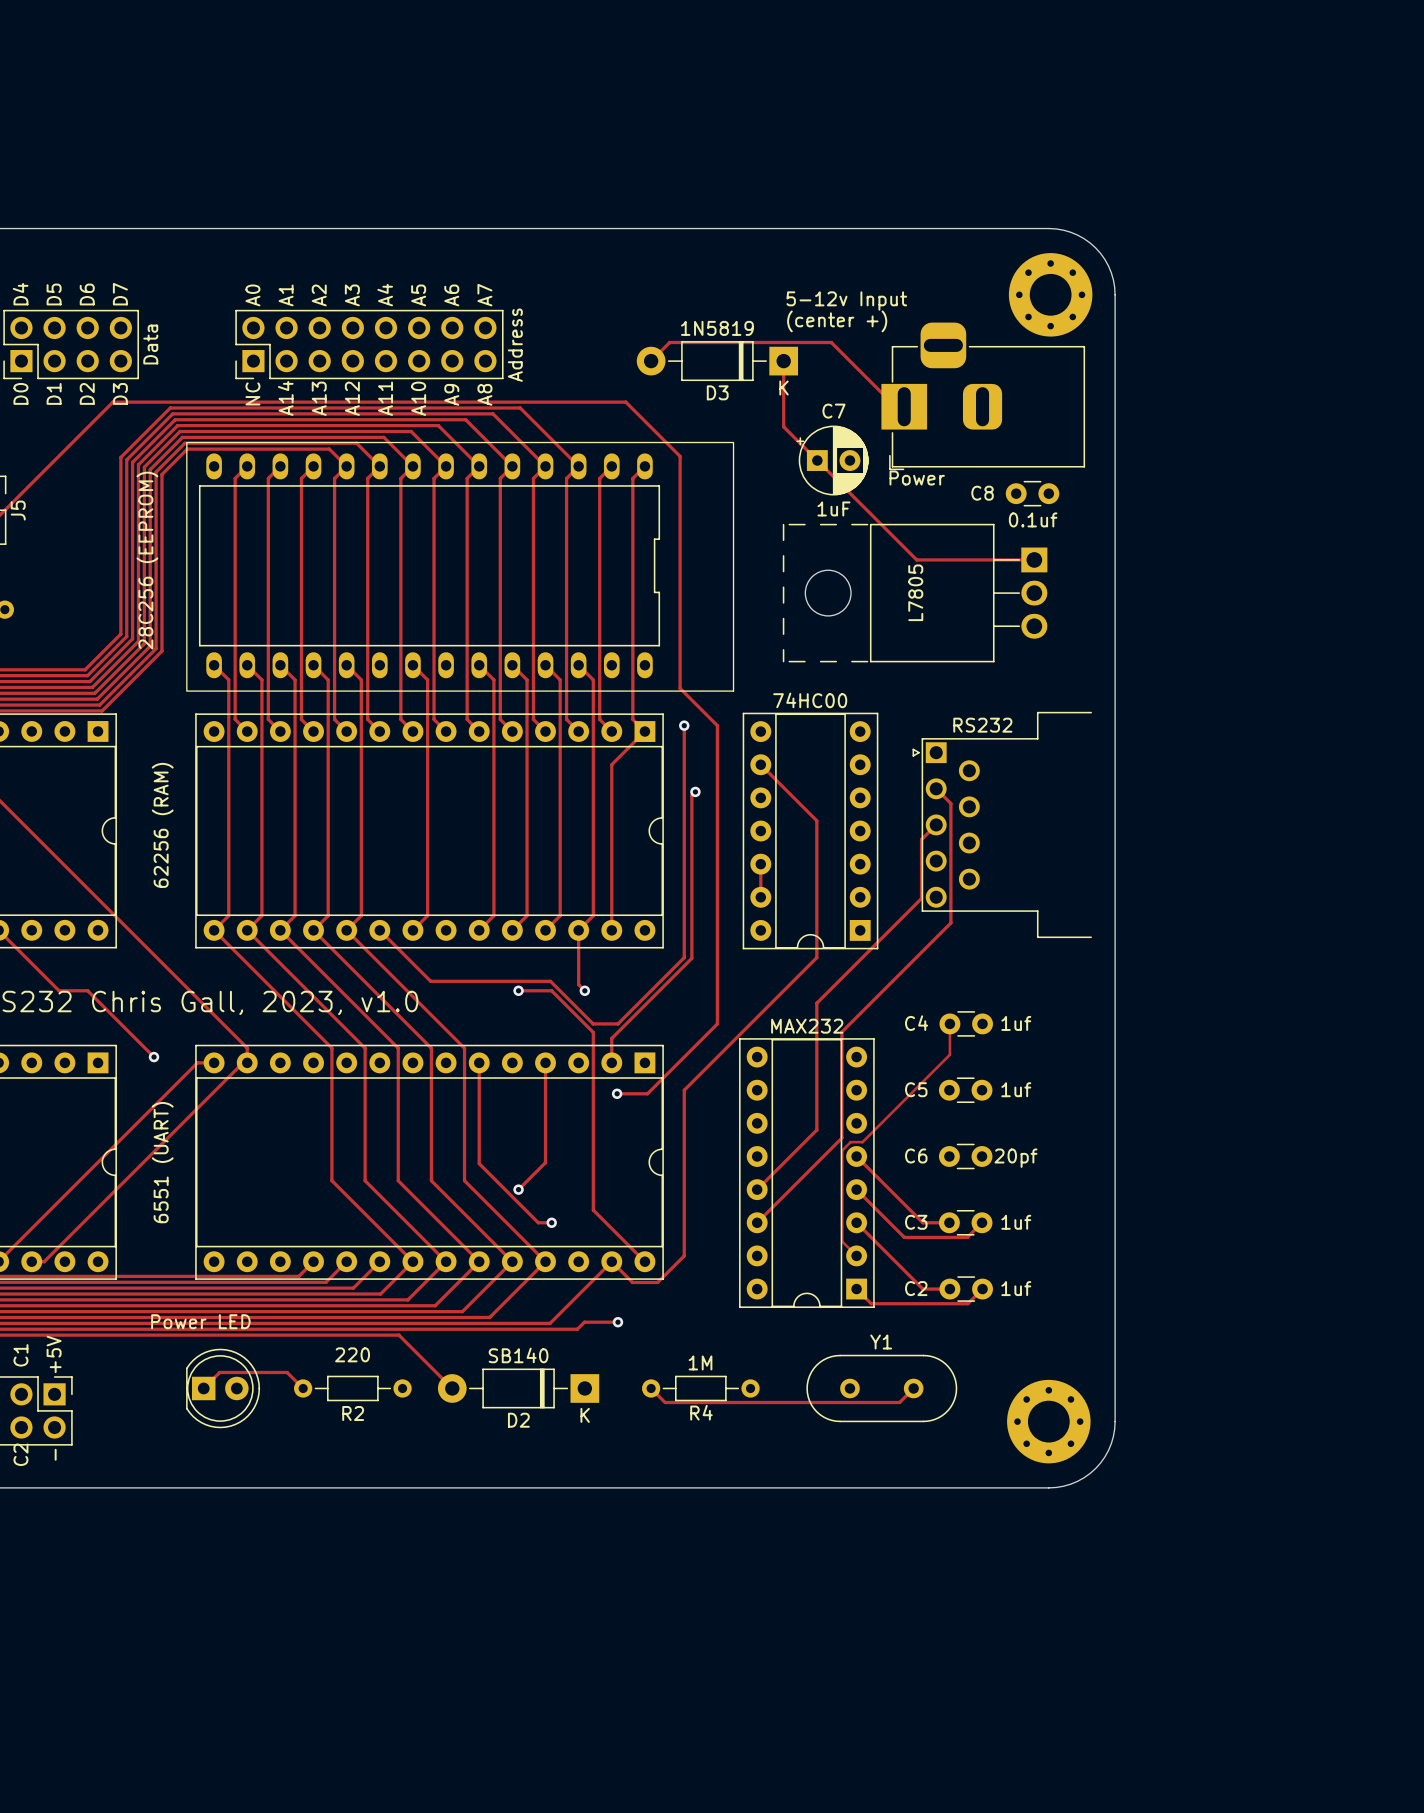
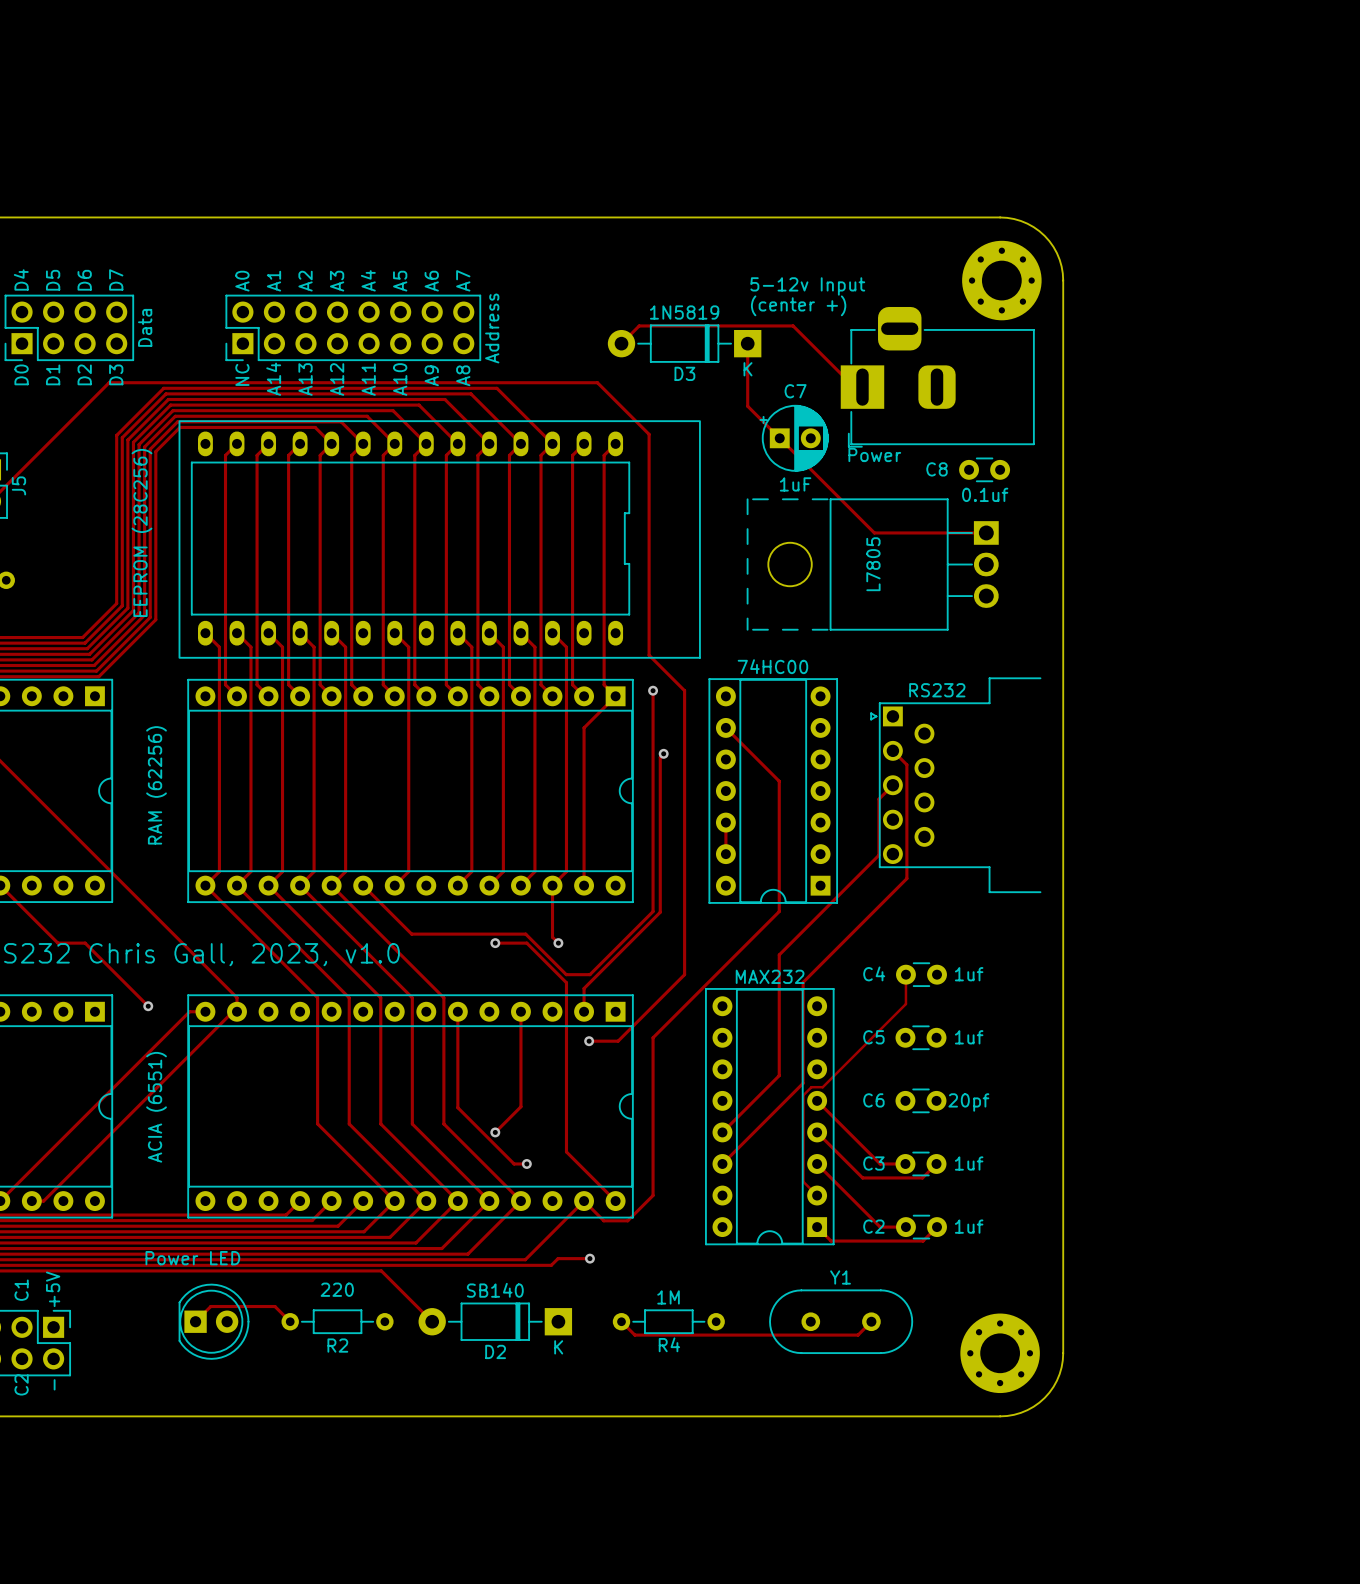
part value: 28C256 (EEPROM) (147, 560) -> EEPROM (28C256) (141, 532)
part value: 62256 (RAM) (162, 825) -> RAM (62256) (156, 785)
part value: 6551 (UART) (162, 1162) -> ACIA (6551) (156, 1107)

